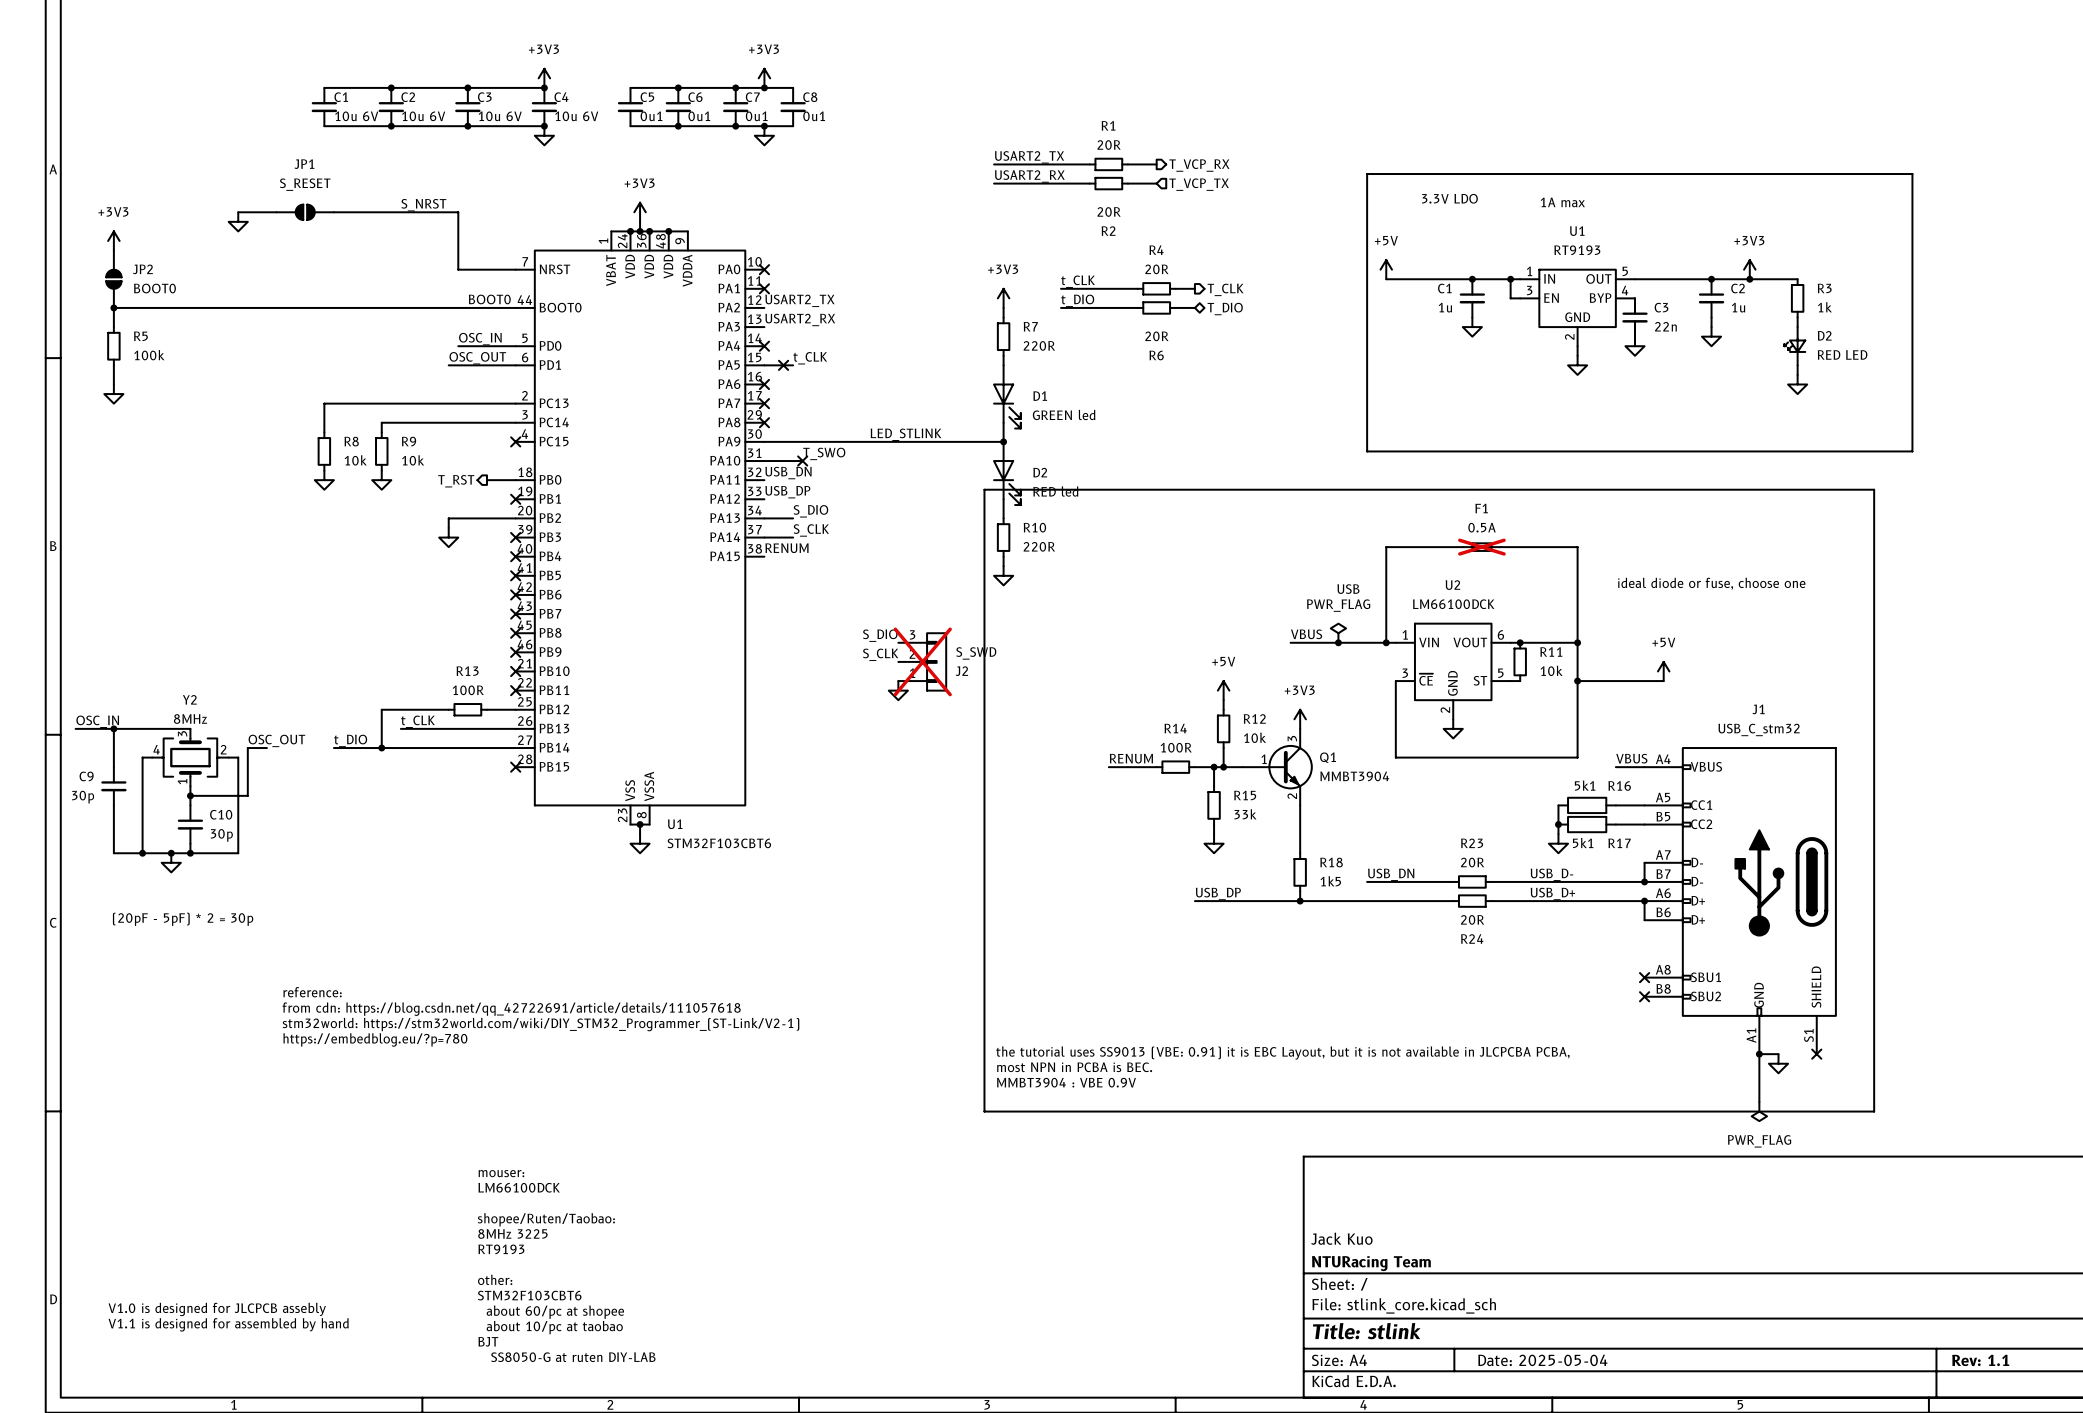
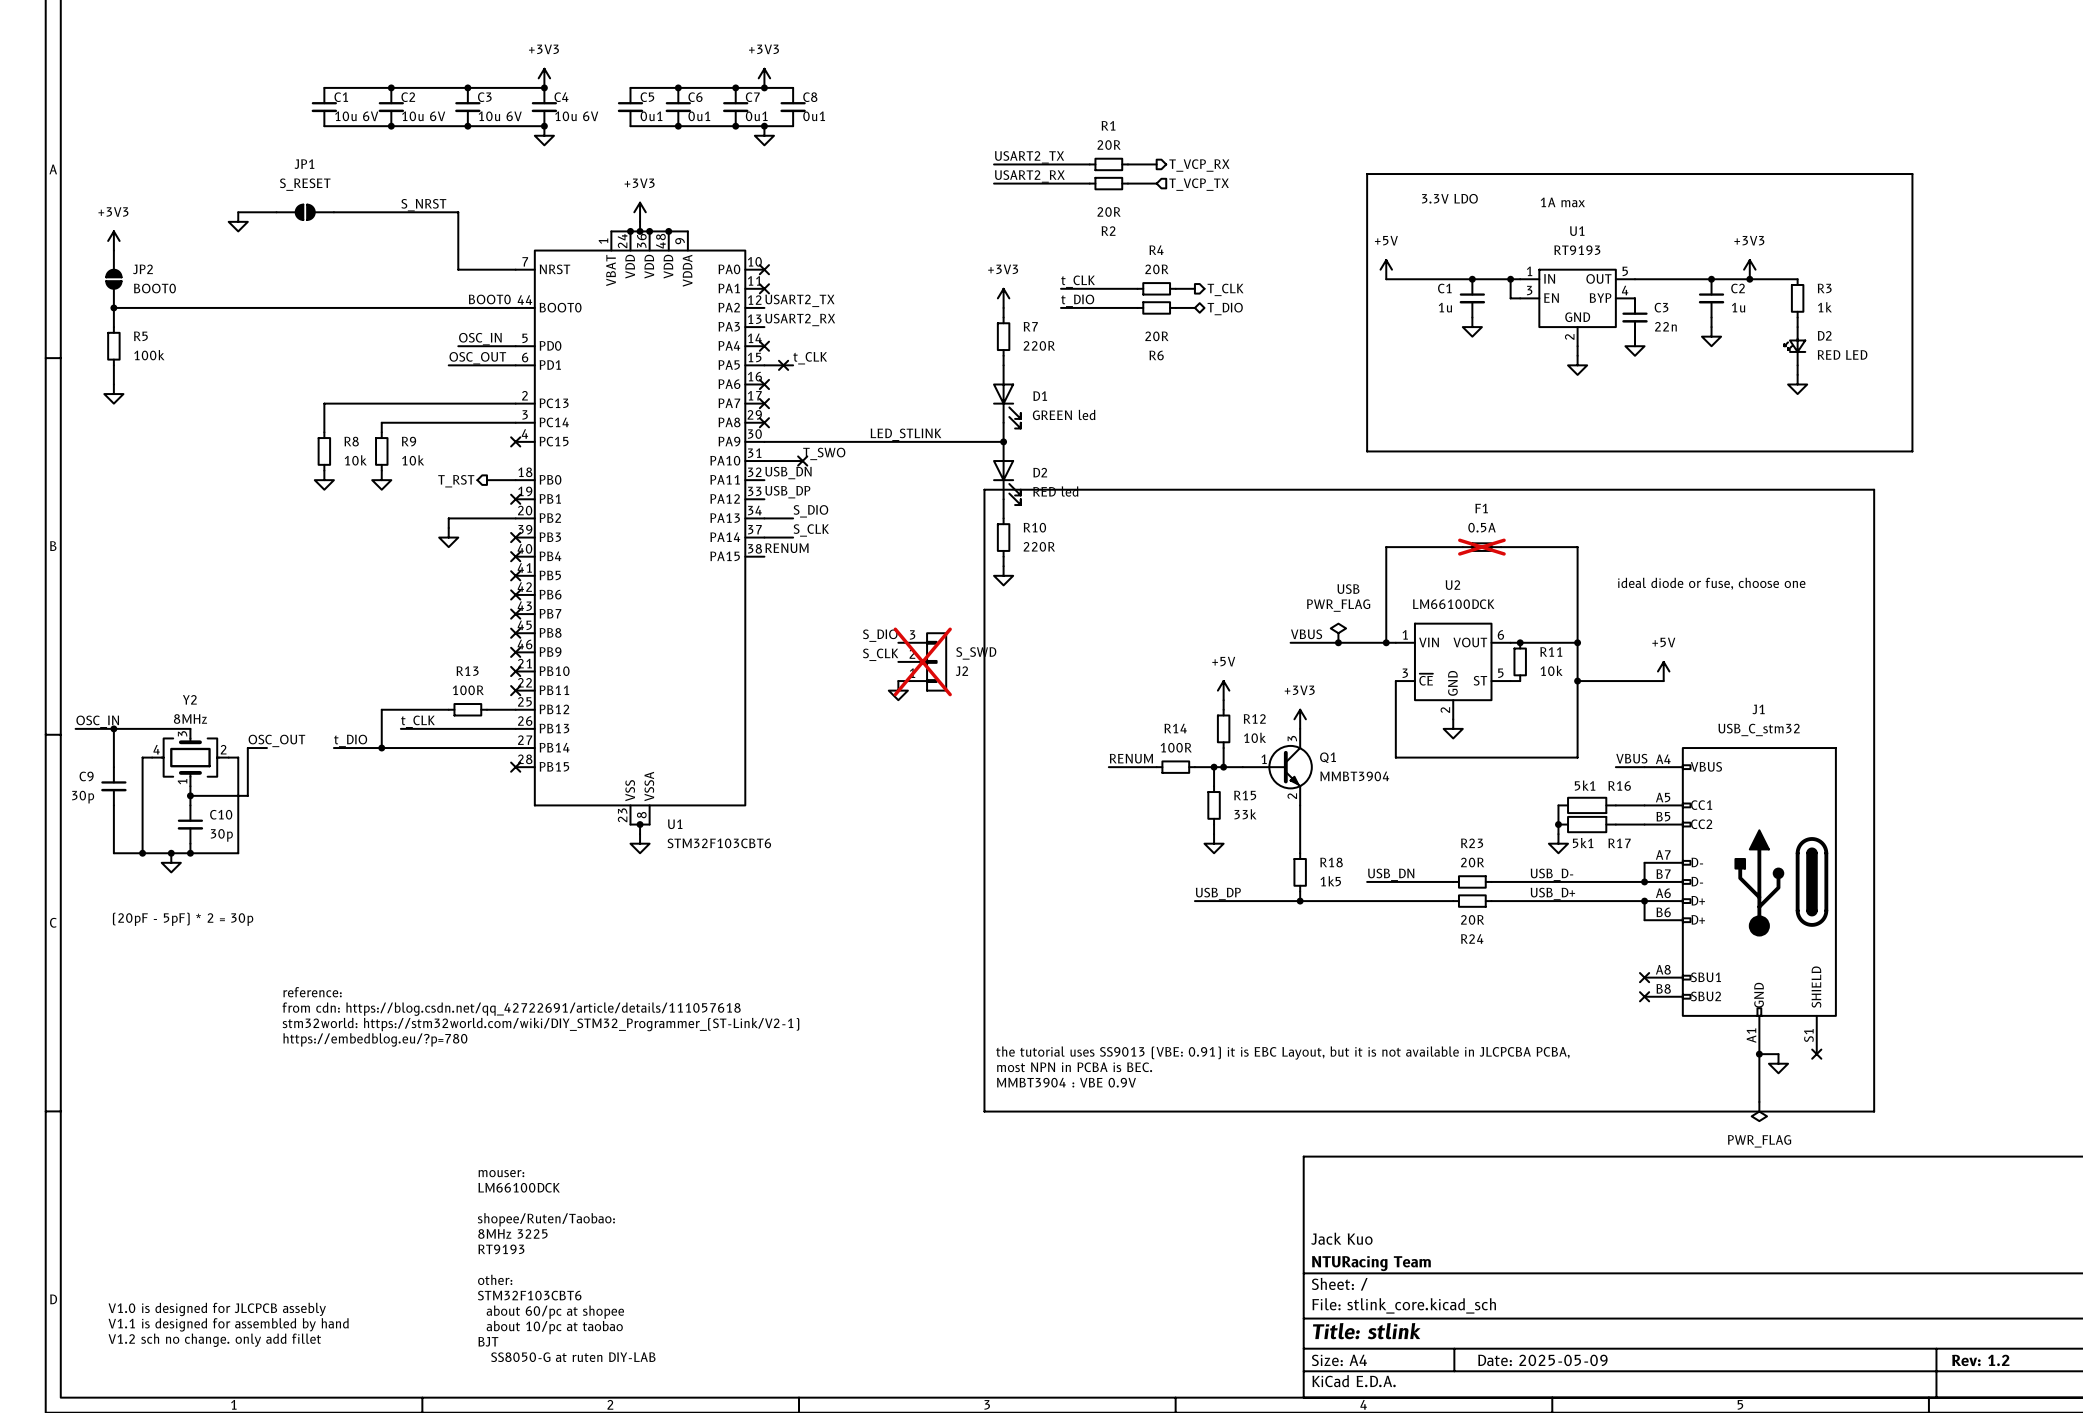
text: none -> V1.2 sch no change. only add fillet (214, 1340)
title block: Date: 2025-05-04 (1542, 1360) -> Date: 2025-05-09 (1542, 1360)
title block: Rev: 1.1 (1980, 1360) -> Rev: 1.2 (1980, 1360)

